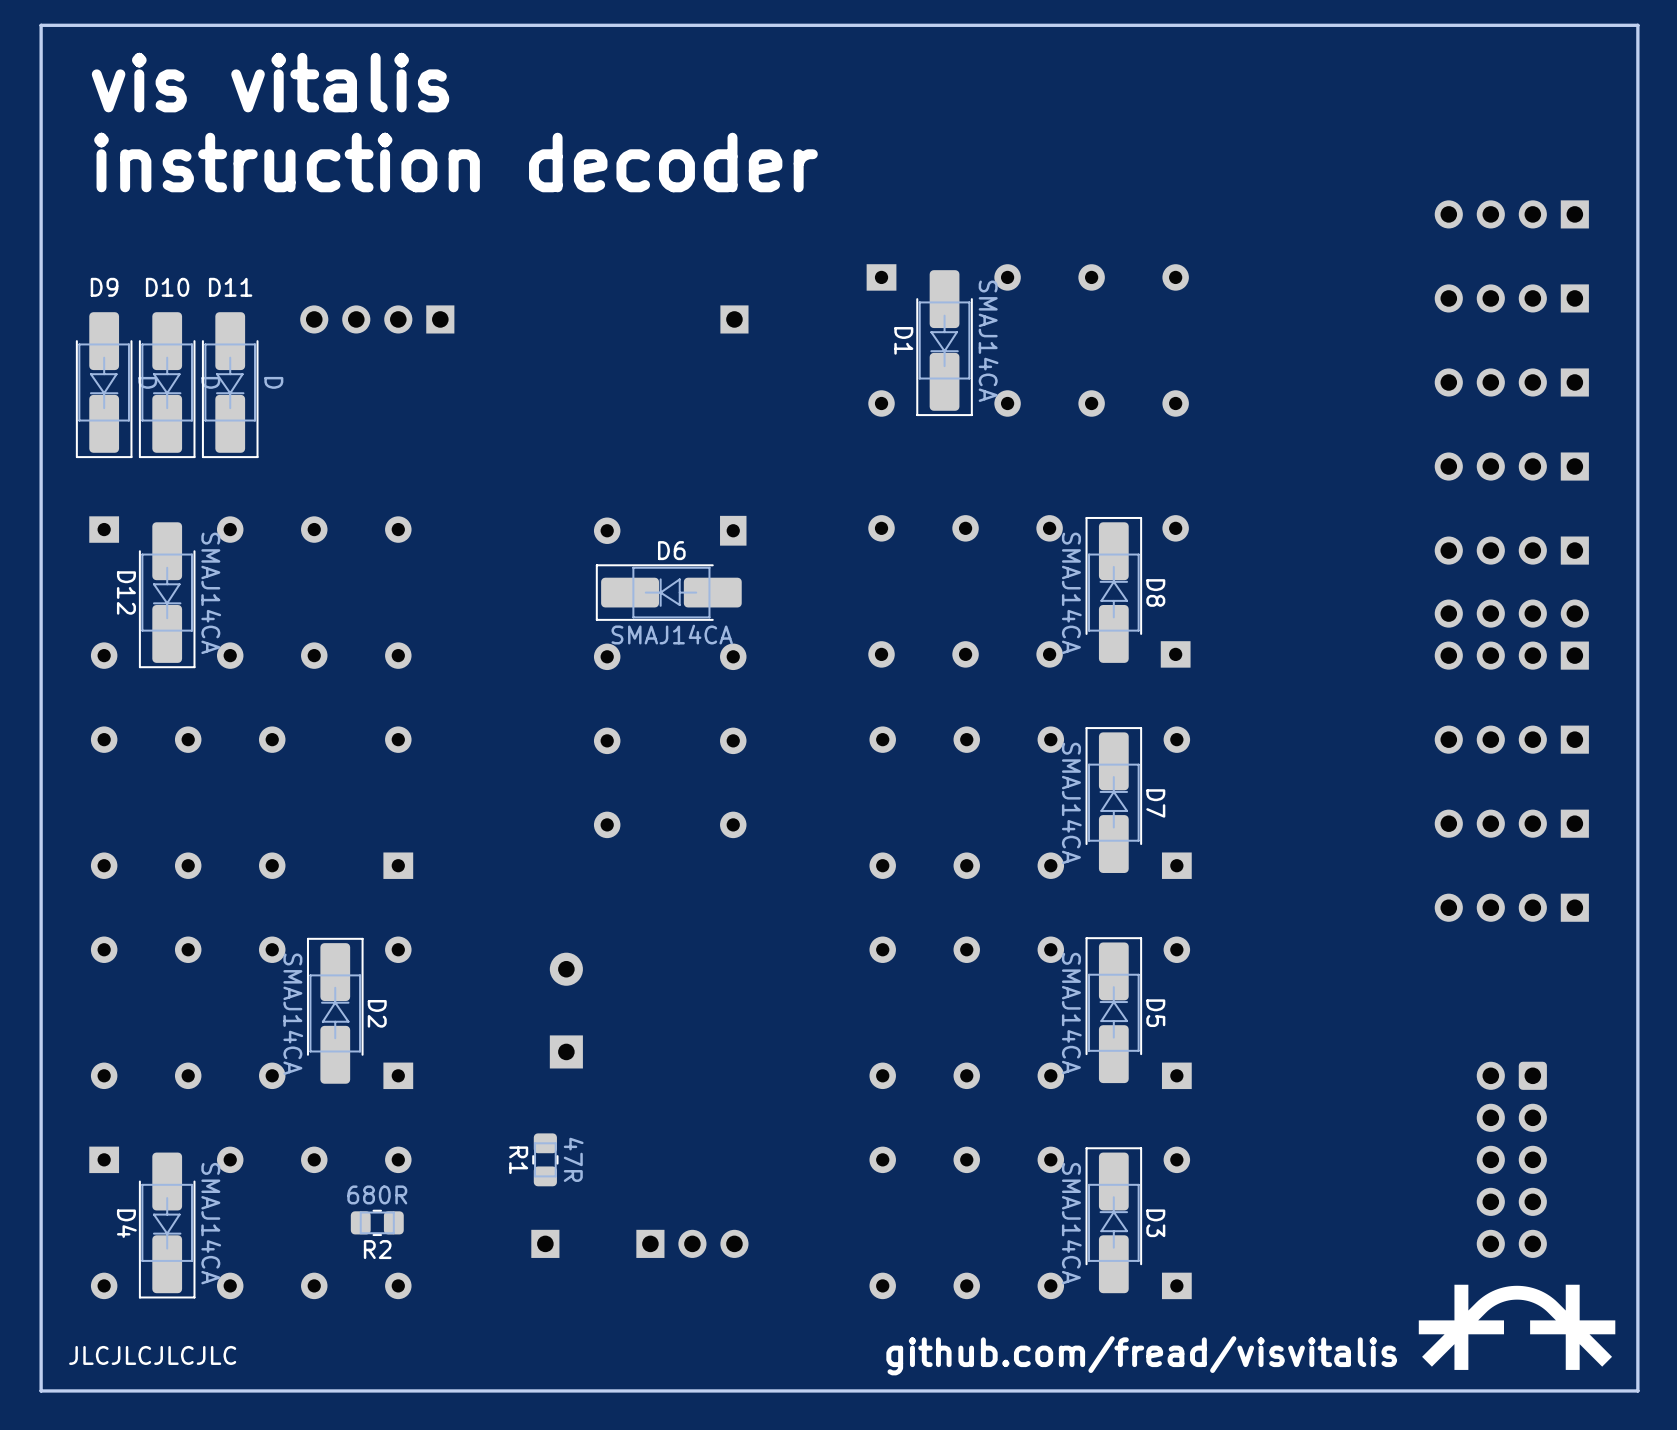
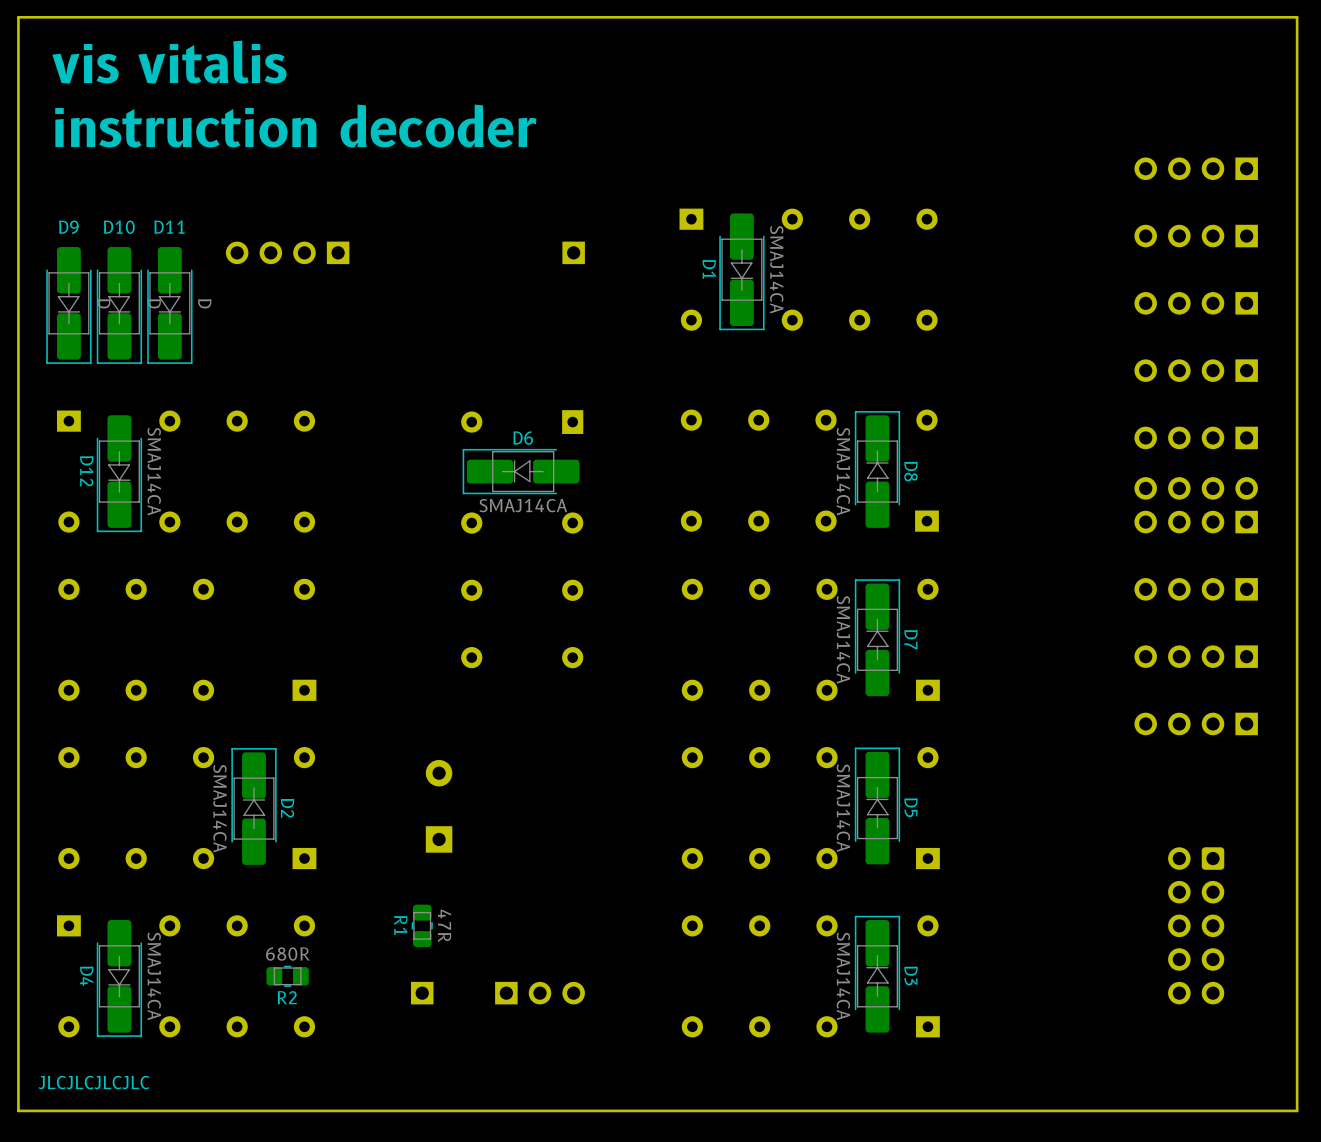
drawing: [1418, 1284, 1616, 1370] -> none
text: github.com/fread/visvitalis (1141, 1355) -> none

